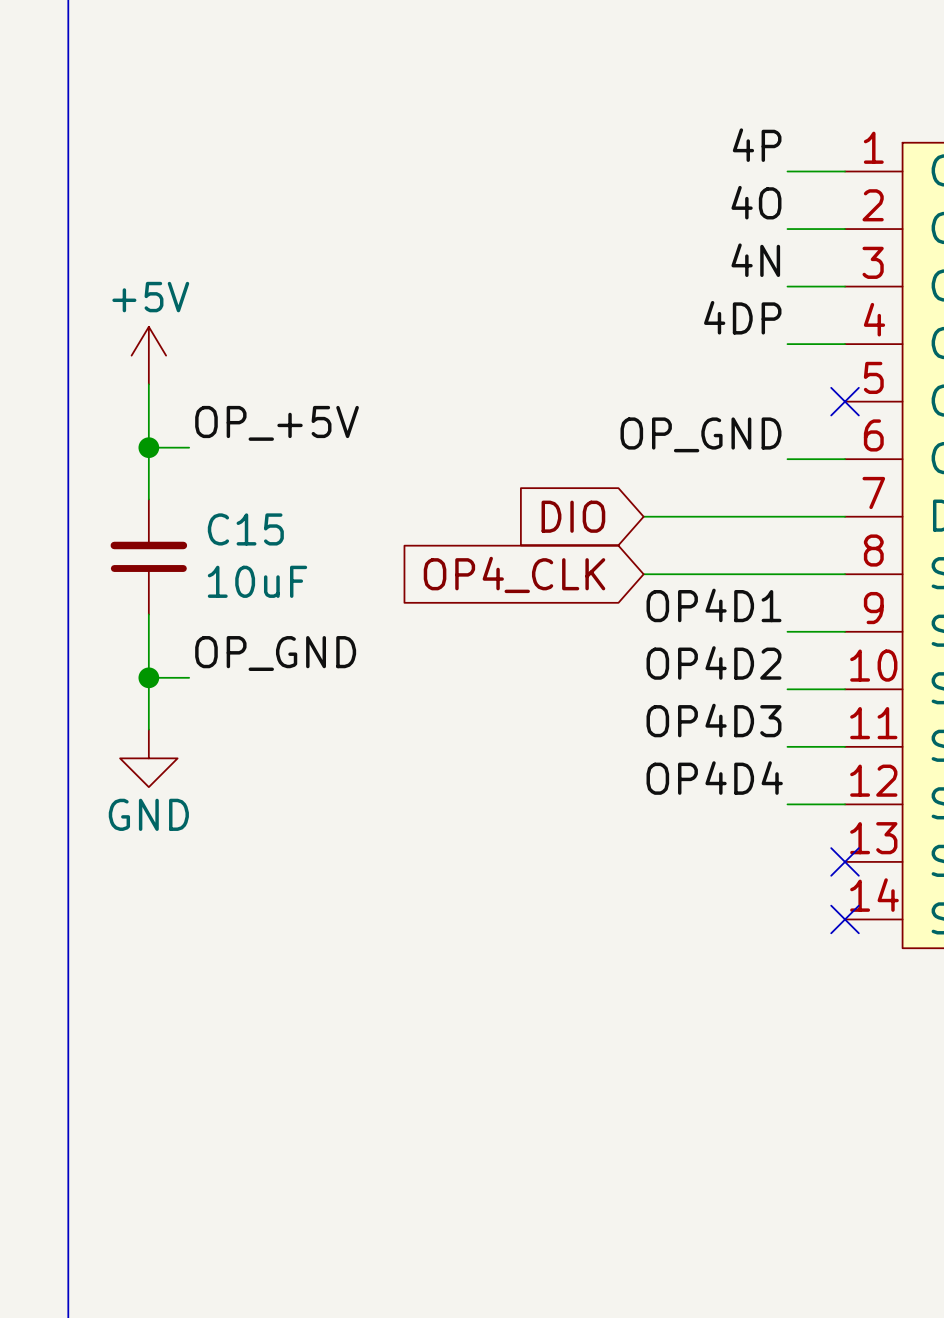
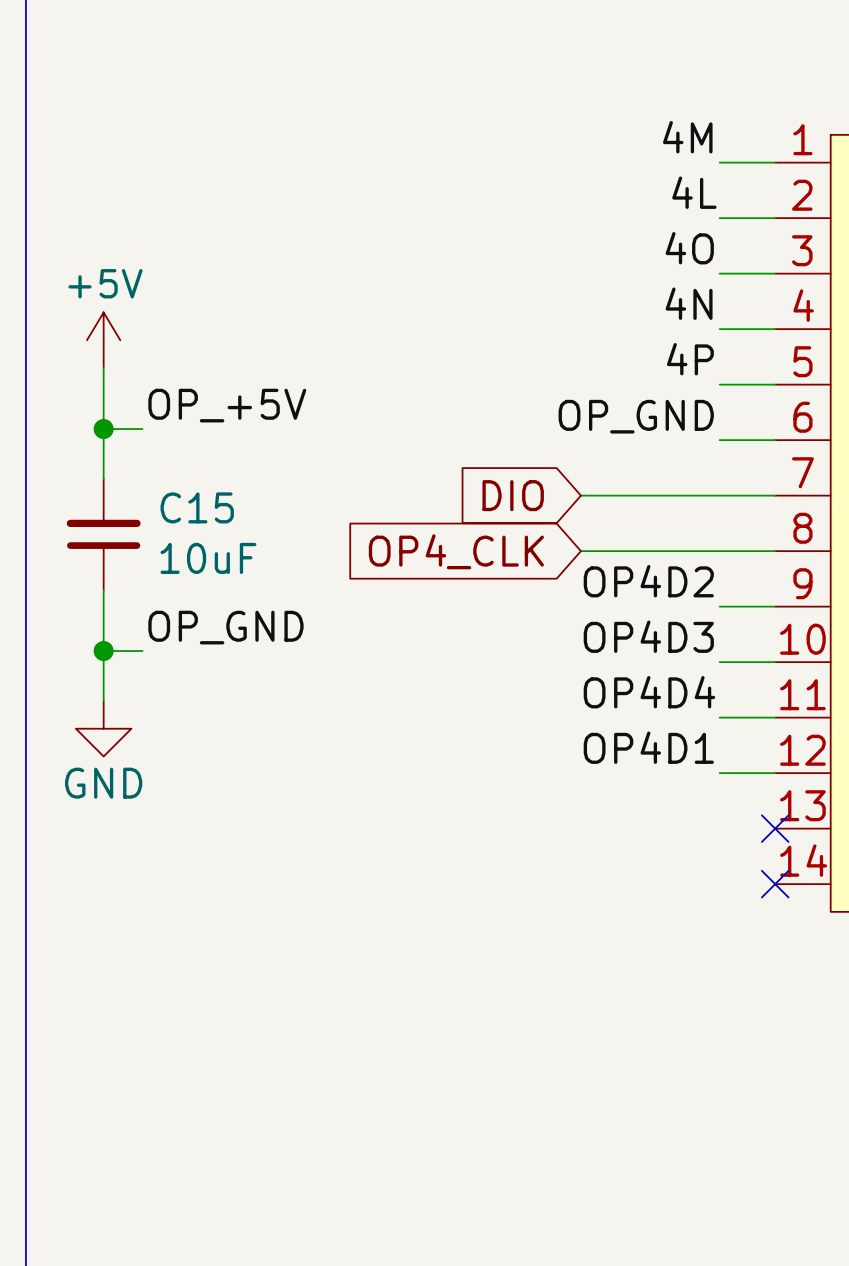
label: 4P (757, 145) -> 4M (687, 137)
label: 4O (756, 202) -> 4L (694, 192)
label: 4N (755, 260) -> 4O (689, 248)
label: 4DP (742, 317) -> 4N (689, 303)
label: none -> 4P (690, 359)
wire: none -> (719, 384) (775, 384)
no-connect mark: (845, 401) -> none
label: OP4D1 (713, 605) -> OP4D2 (648, 581)
label: OP4D2 (713, 662) -> OP4D3 (648, 636)
label: OP4D3 (713, 720) -> OP4D4 (649, 692)
label: OP4D4 (714, 778) -> OP4D1 (648, 747)

